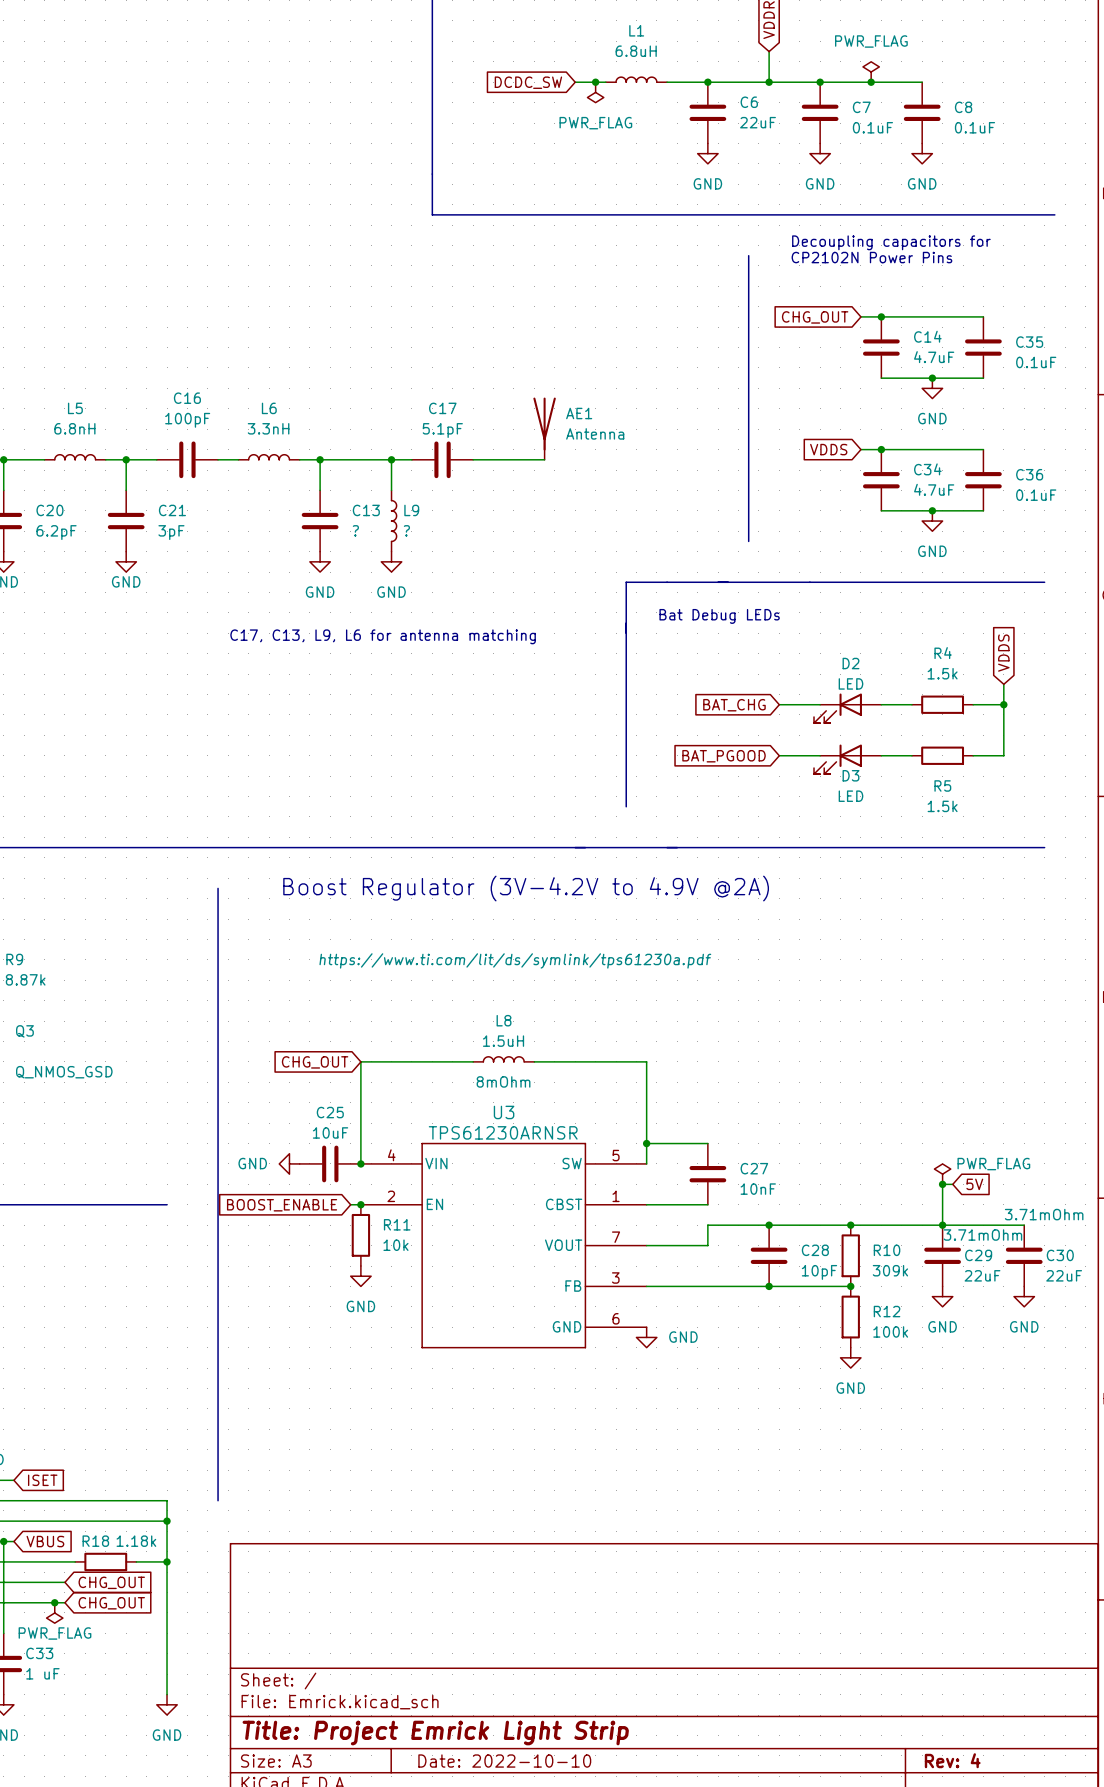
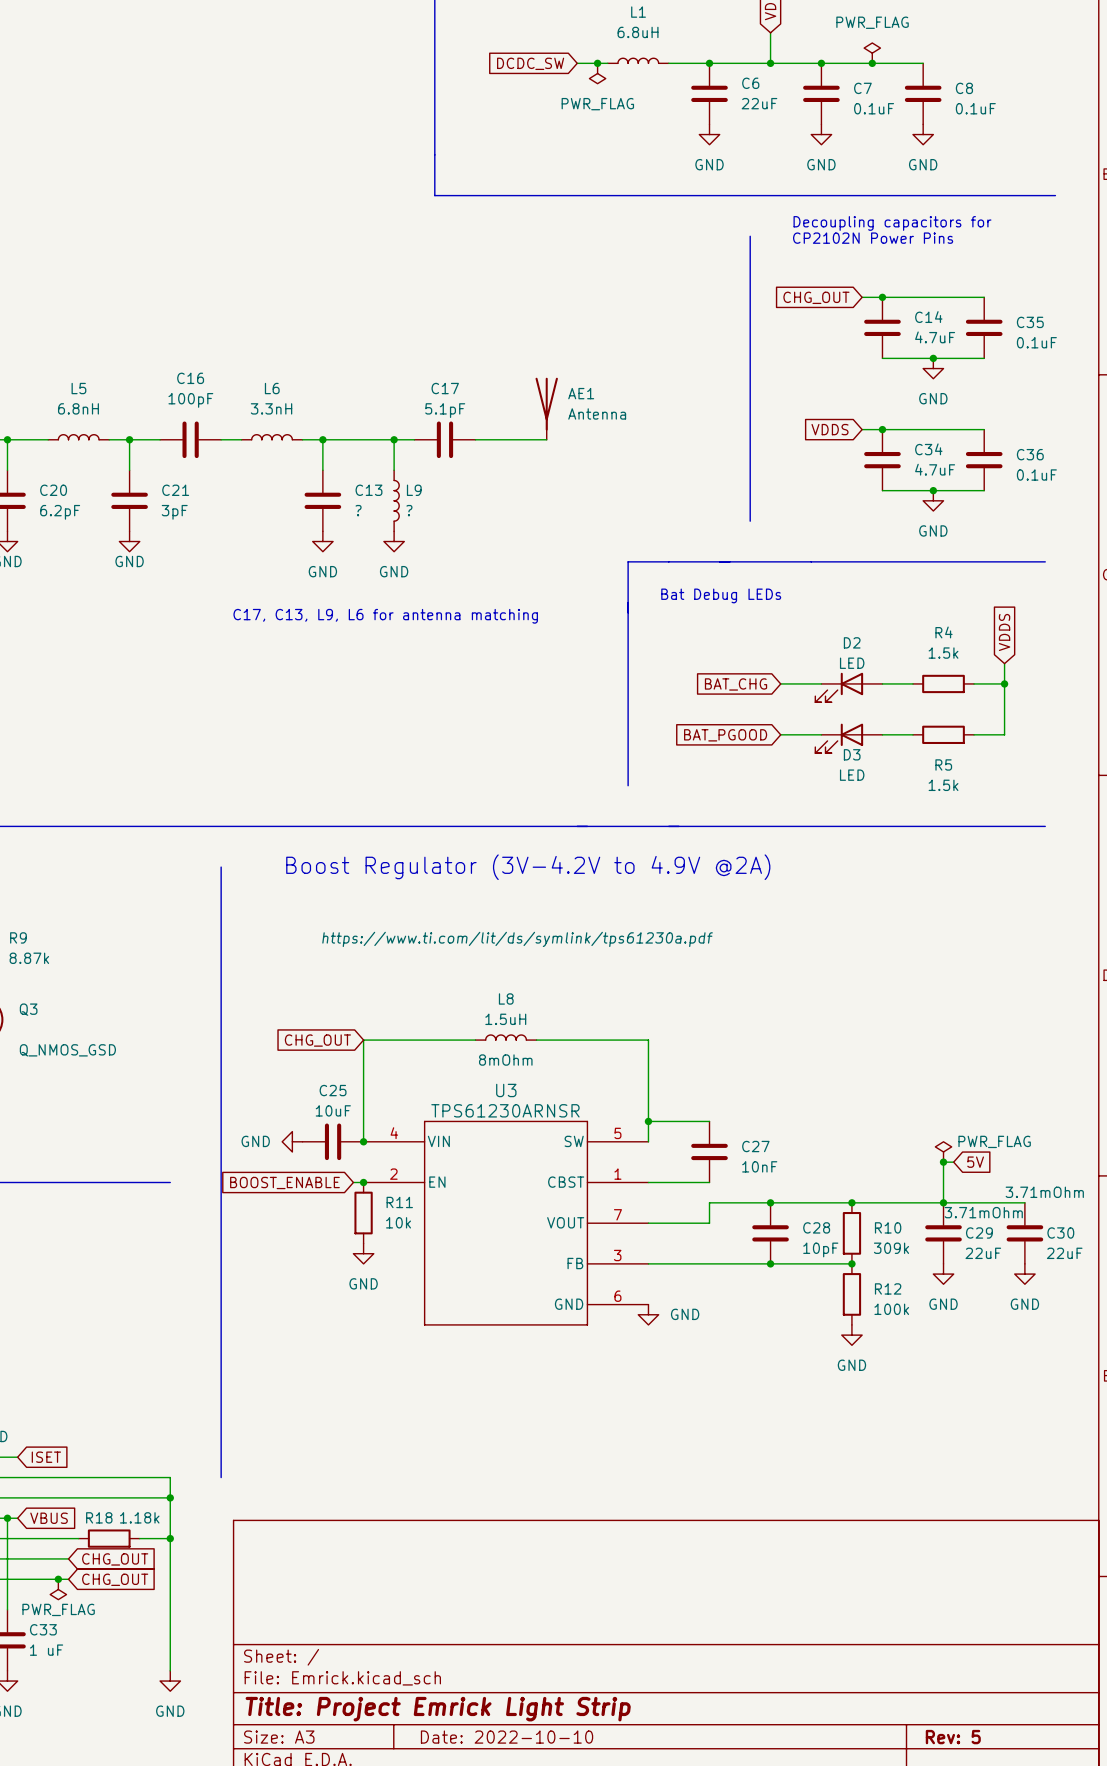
title block: Rev: 4 (952, 1760) -> Rev: 5 (953, 1737)

